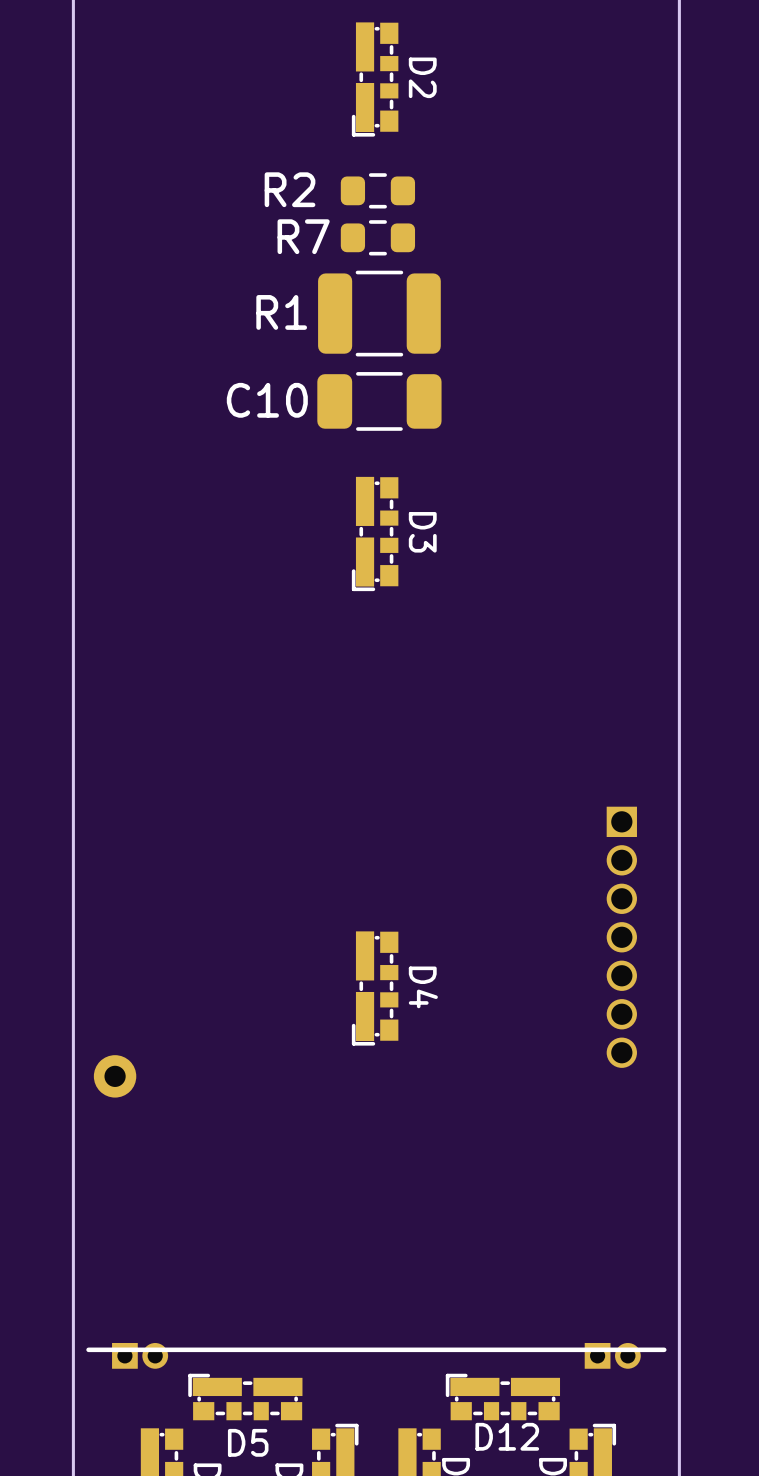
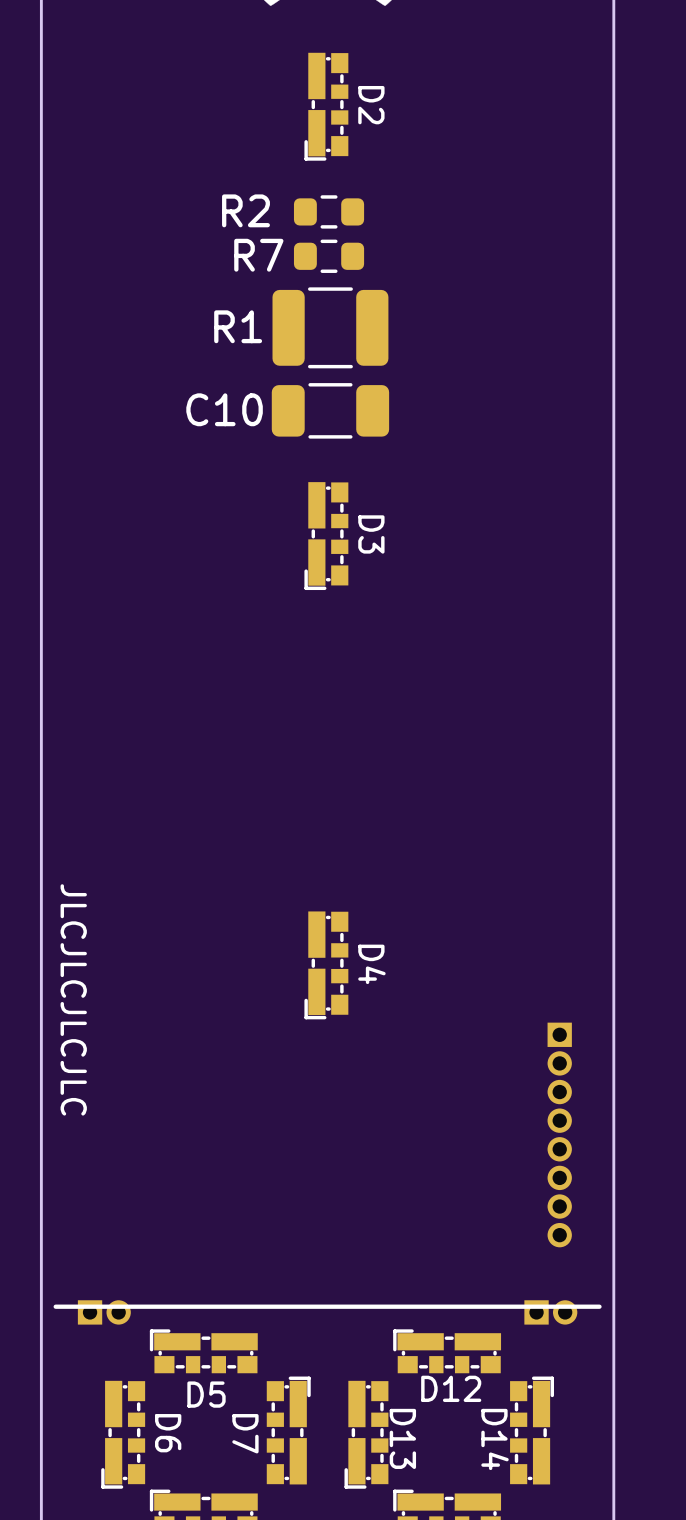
part: (621, 937) -> none
text: none -> JLCJLCJLCJLC (73, 999)
part: (115, 1076) -> none
part: none -> (559, 1134)

